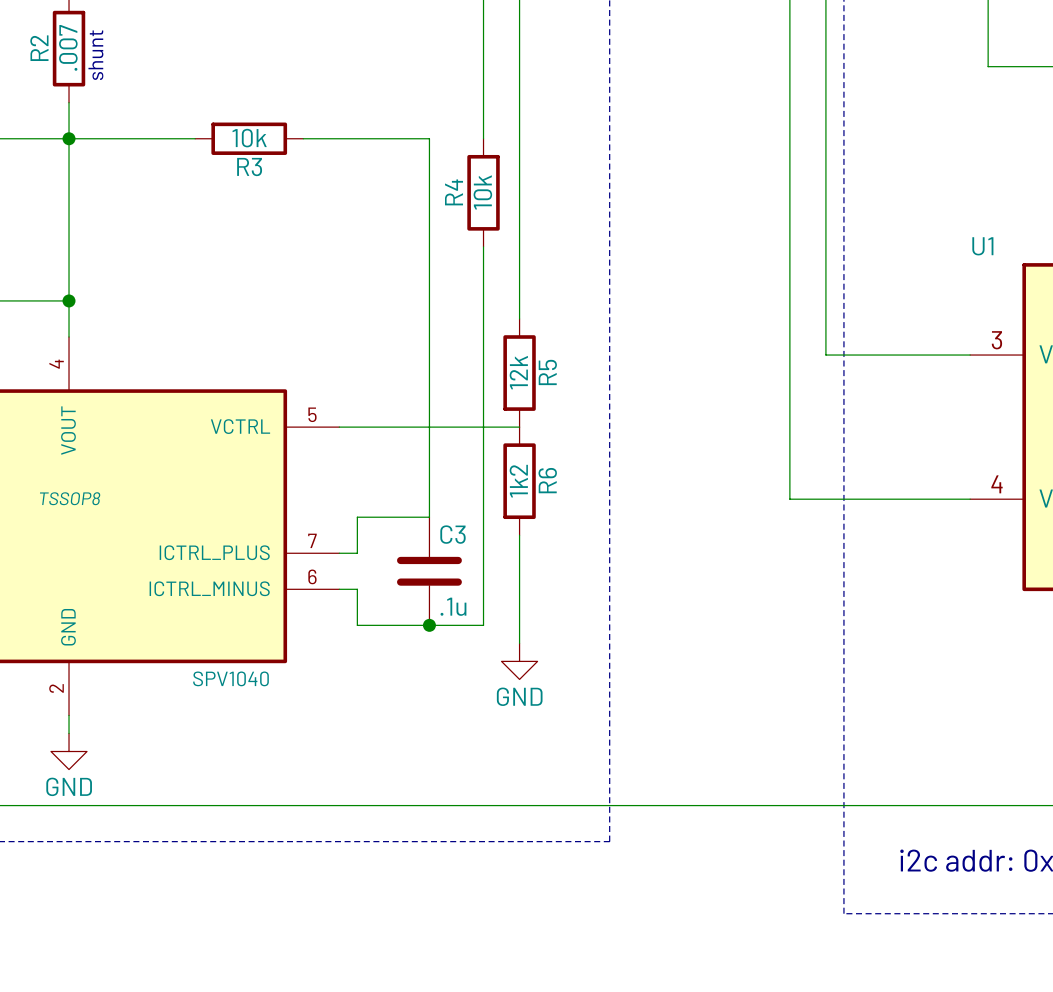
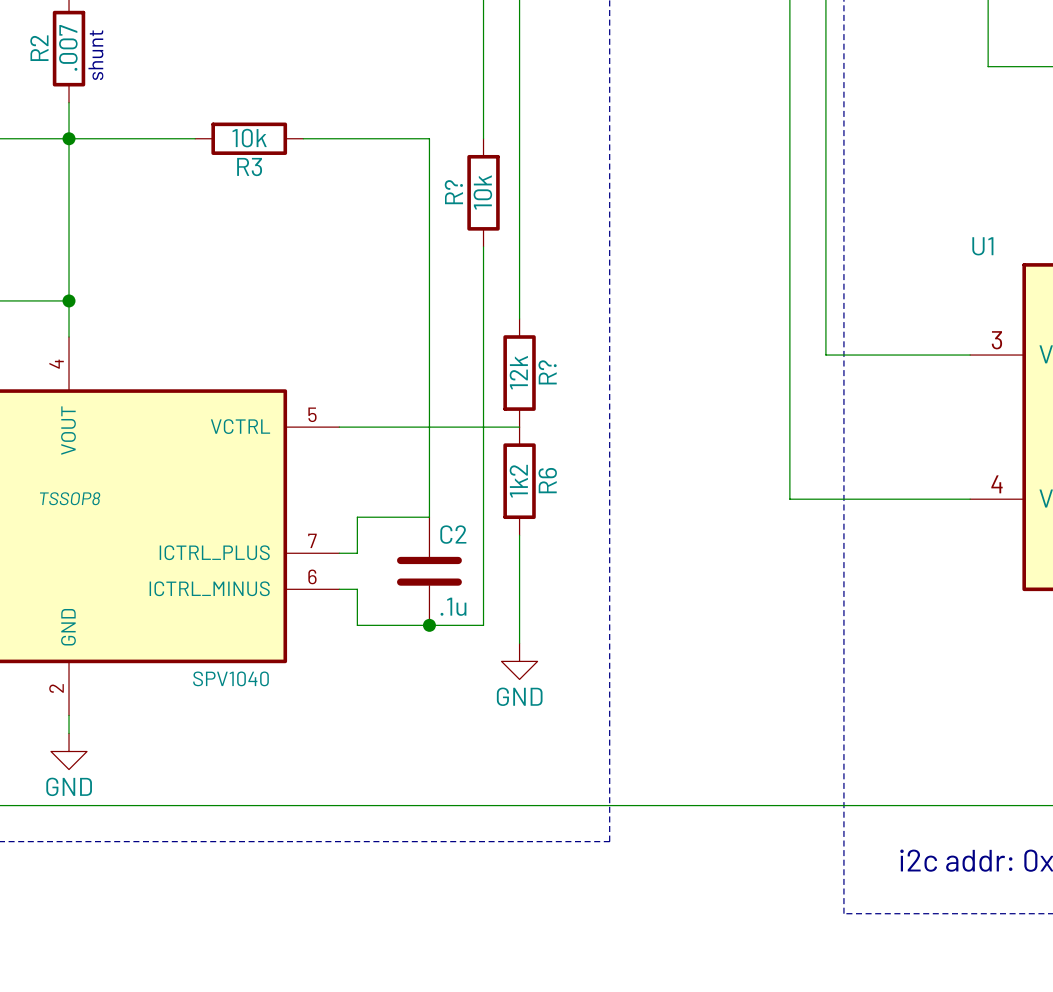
R4 name: R4 (454, 192) -> R? (453, 192)
R5 name: R5 (547, 372) -> R? (547, 372)
C3 name: C3 (452, 534) -> C2 (453, 534)

